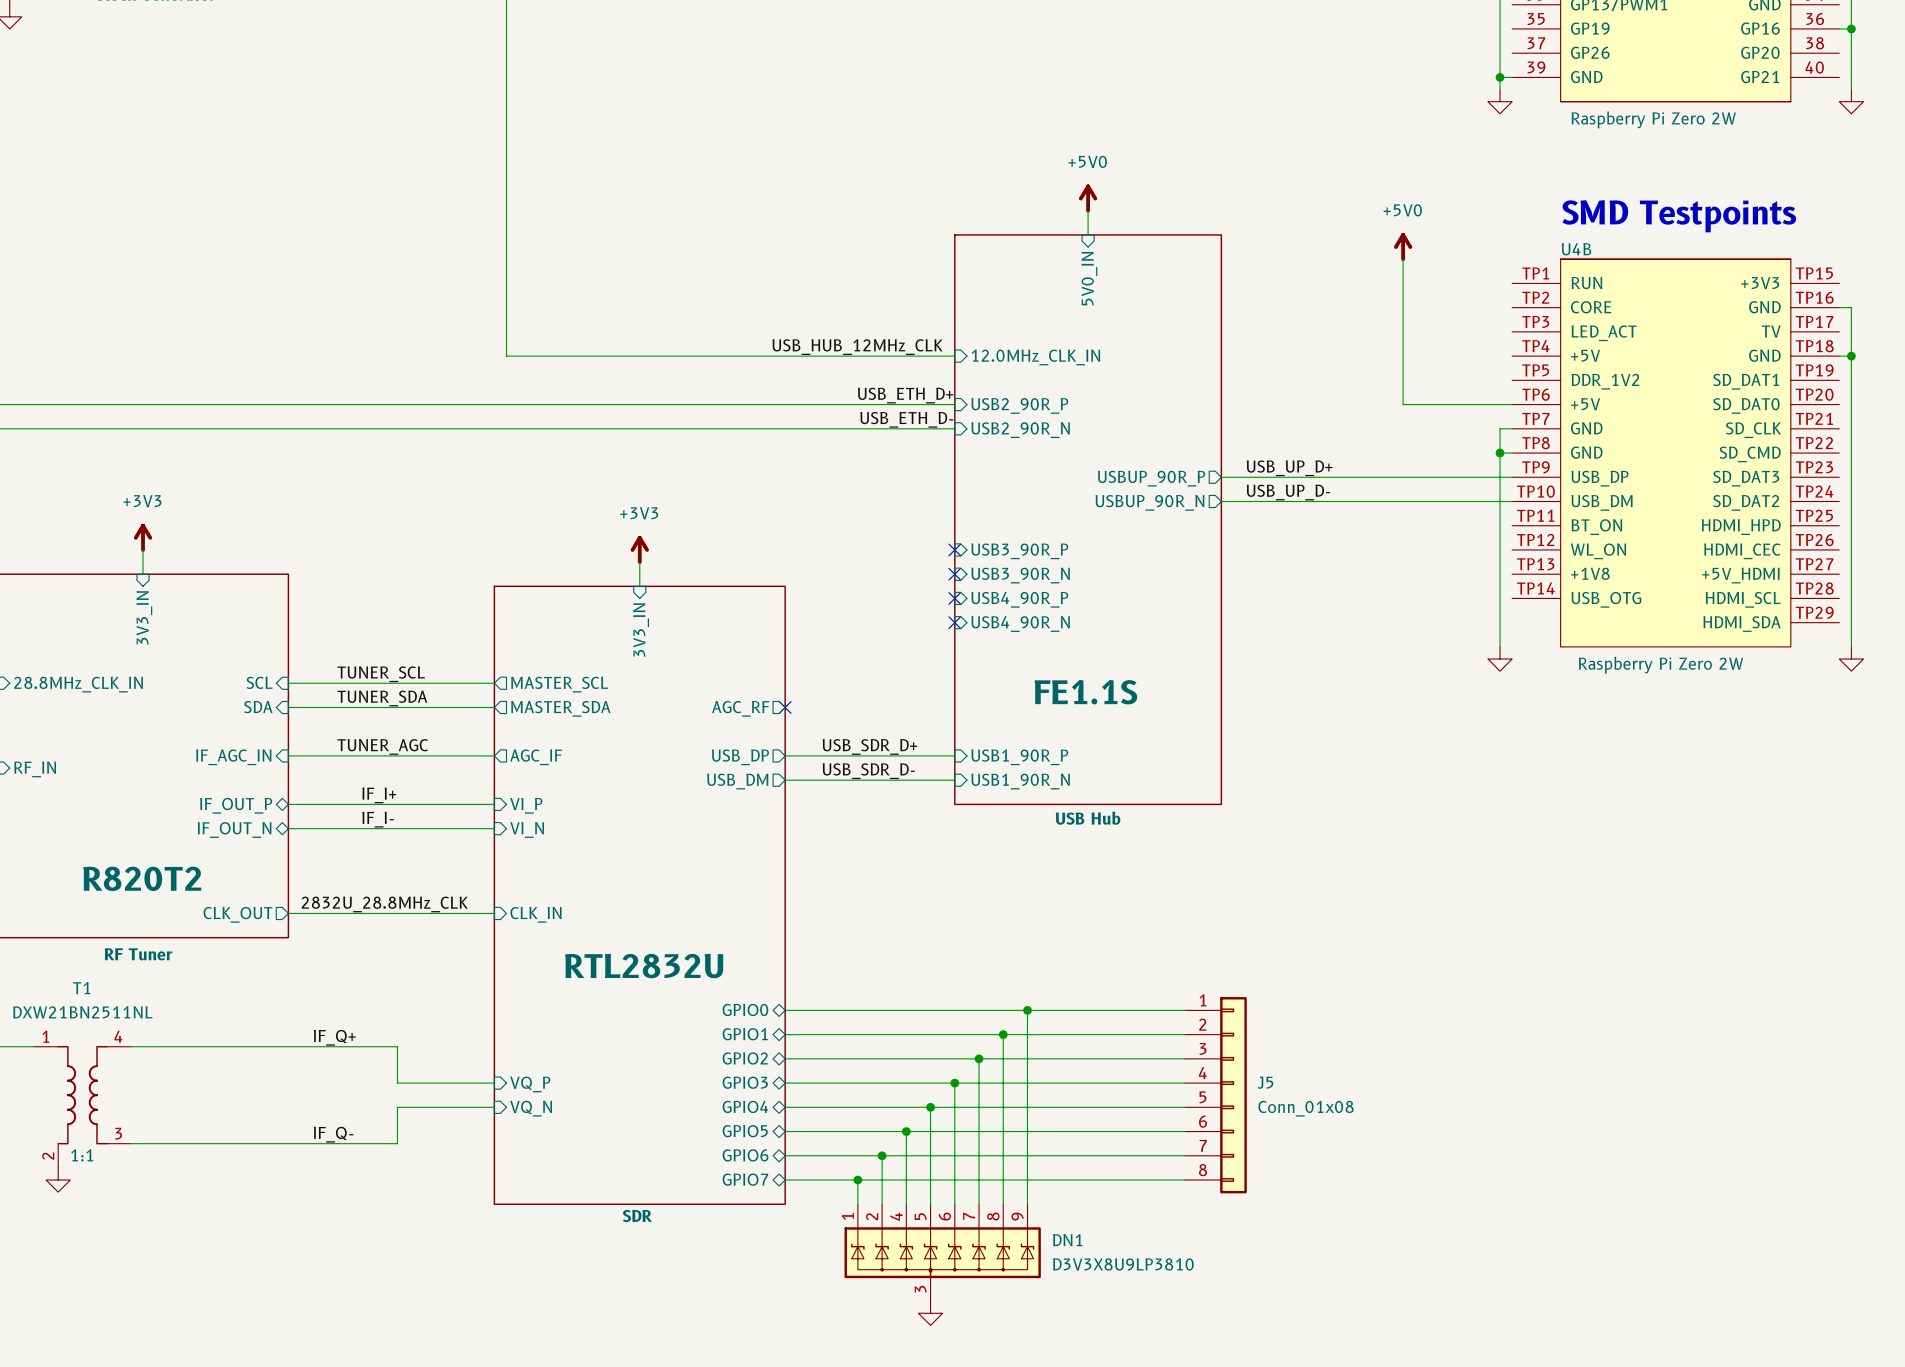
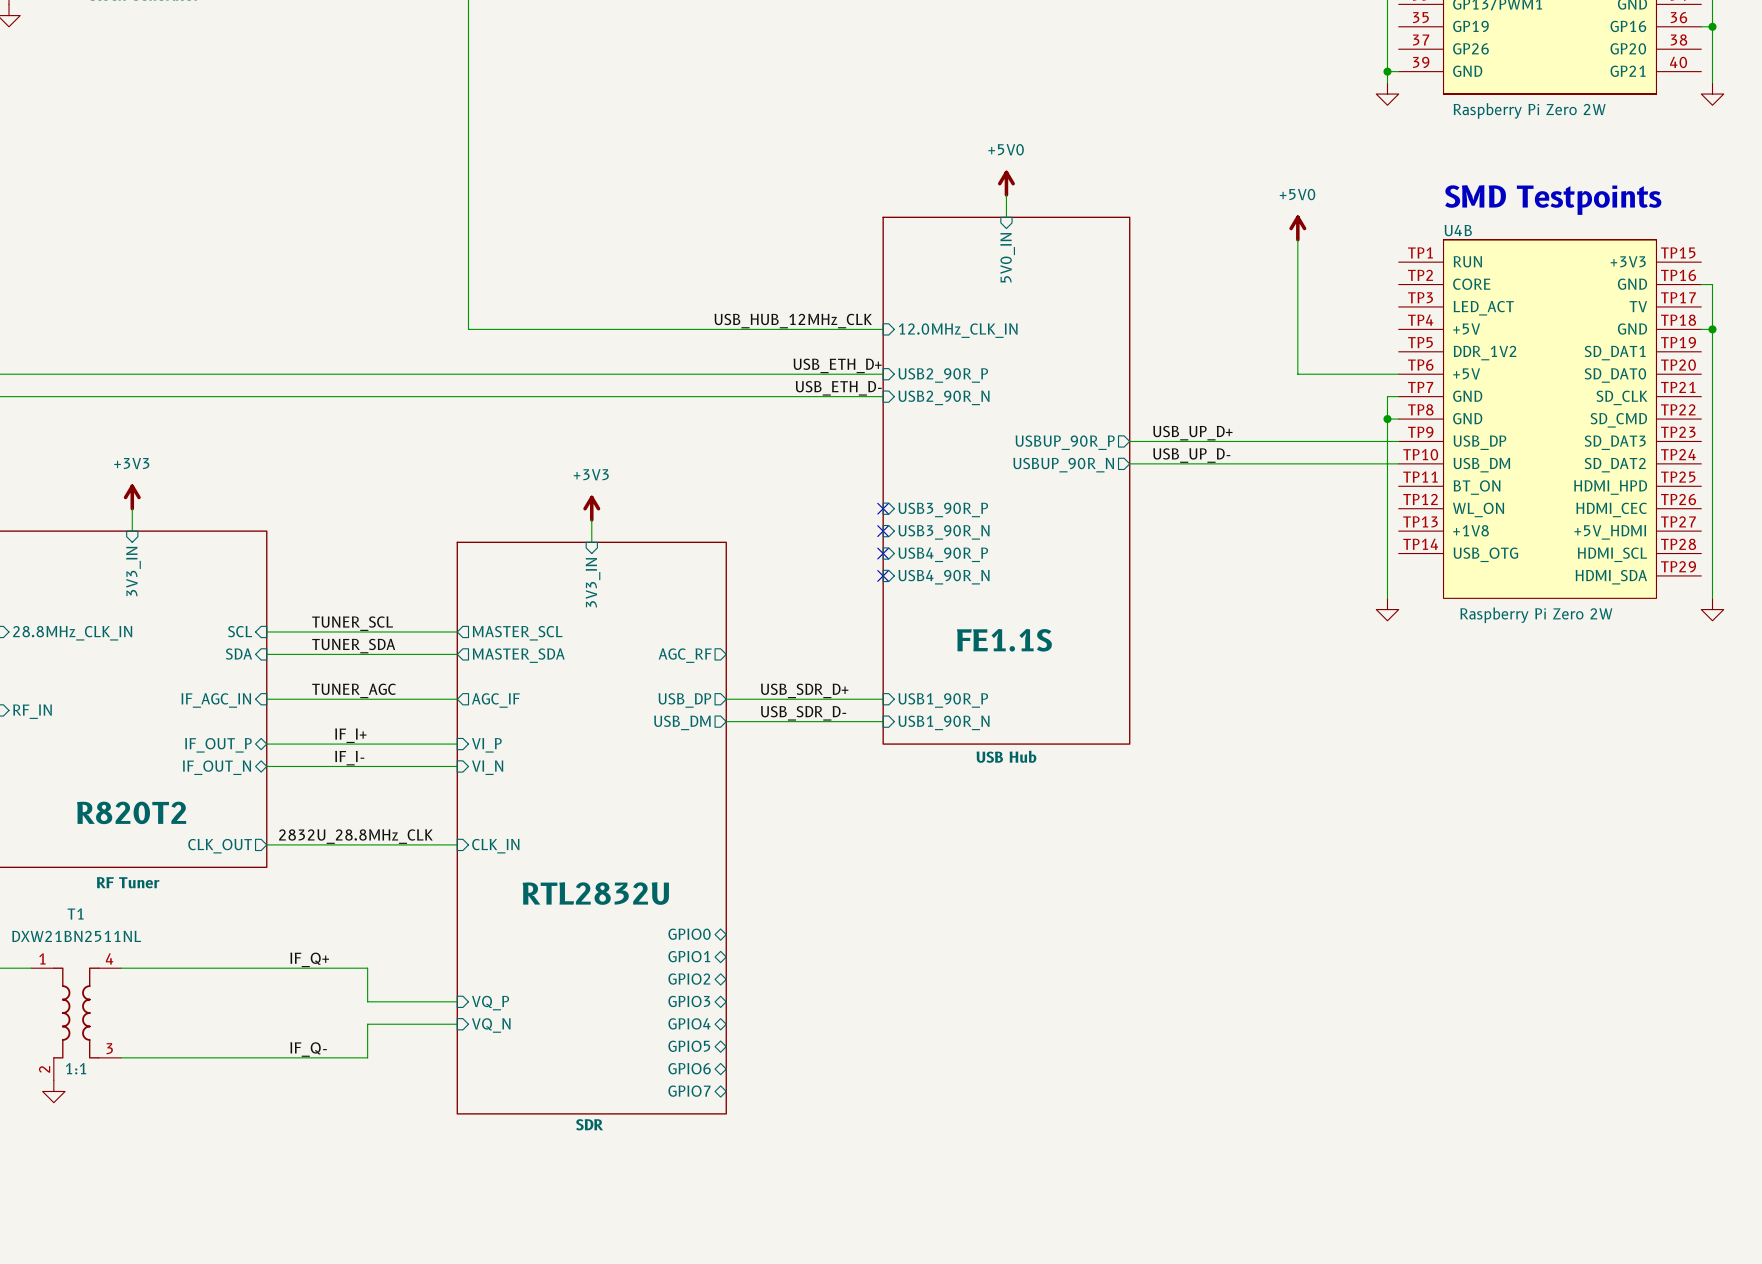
no-connect mark: (785, 707) -> none
wire: (785, 1010) (1185, 1010) -> none
wire: (1027, 1010) (1027, 1204) -> none
junction: (1027, 1010) -> none
wire: (785, 1034) (1185, 1034) -> none
wire: (1003, 1034) (1003, 1204) -> none
junction: (1003, 1034) -> none
wire: (785, 1058) (1185, 1058) -> none
wire: (979, 1058) (979, 1204) -> none
junction: (979, 1058) -> none
wire: (785, 1083) (1185, 1083) -> none
wire: (954, 1083) (954, 1204) -> none
junction: (954, 1083) -> none
J5: Conn_01x08 (1215, 1095) -> none
wire: (785, 1107) (1185, 1107) -> none
wire: (930, 1107) (930, 1204) -> none
junction: (930, 1107) -> none
wire: (785, 1131) (1185, 1131) -> none
wire: (906, 1131) (906, 1204) -> none
junction: (906, 1131) -> none
wire: (785, 1155) (1185, 1155) -> none
wire: (882, 1155) (882, 1204) -> none
junction: (882, 1155) -> none
wire: (785, 1180) (1185, 1180) -> none
wire: (857, 1180) (857, 1204) -> none
junction: (857, 1180) -> none
DN1: D3V3X8U9LP3810 (942, 1252) -> none
power symbol: (930, 1313) -> none

